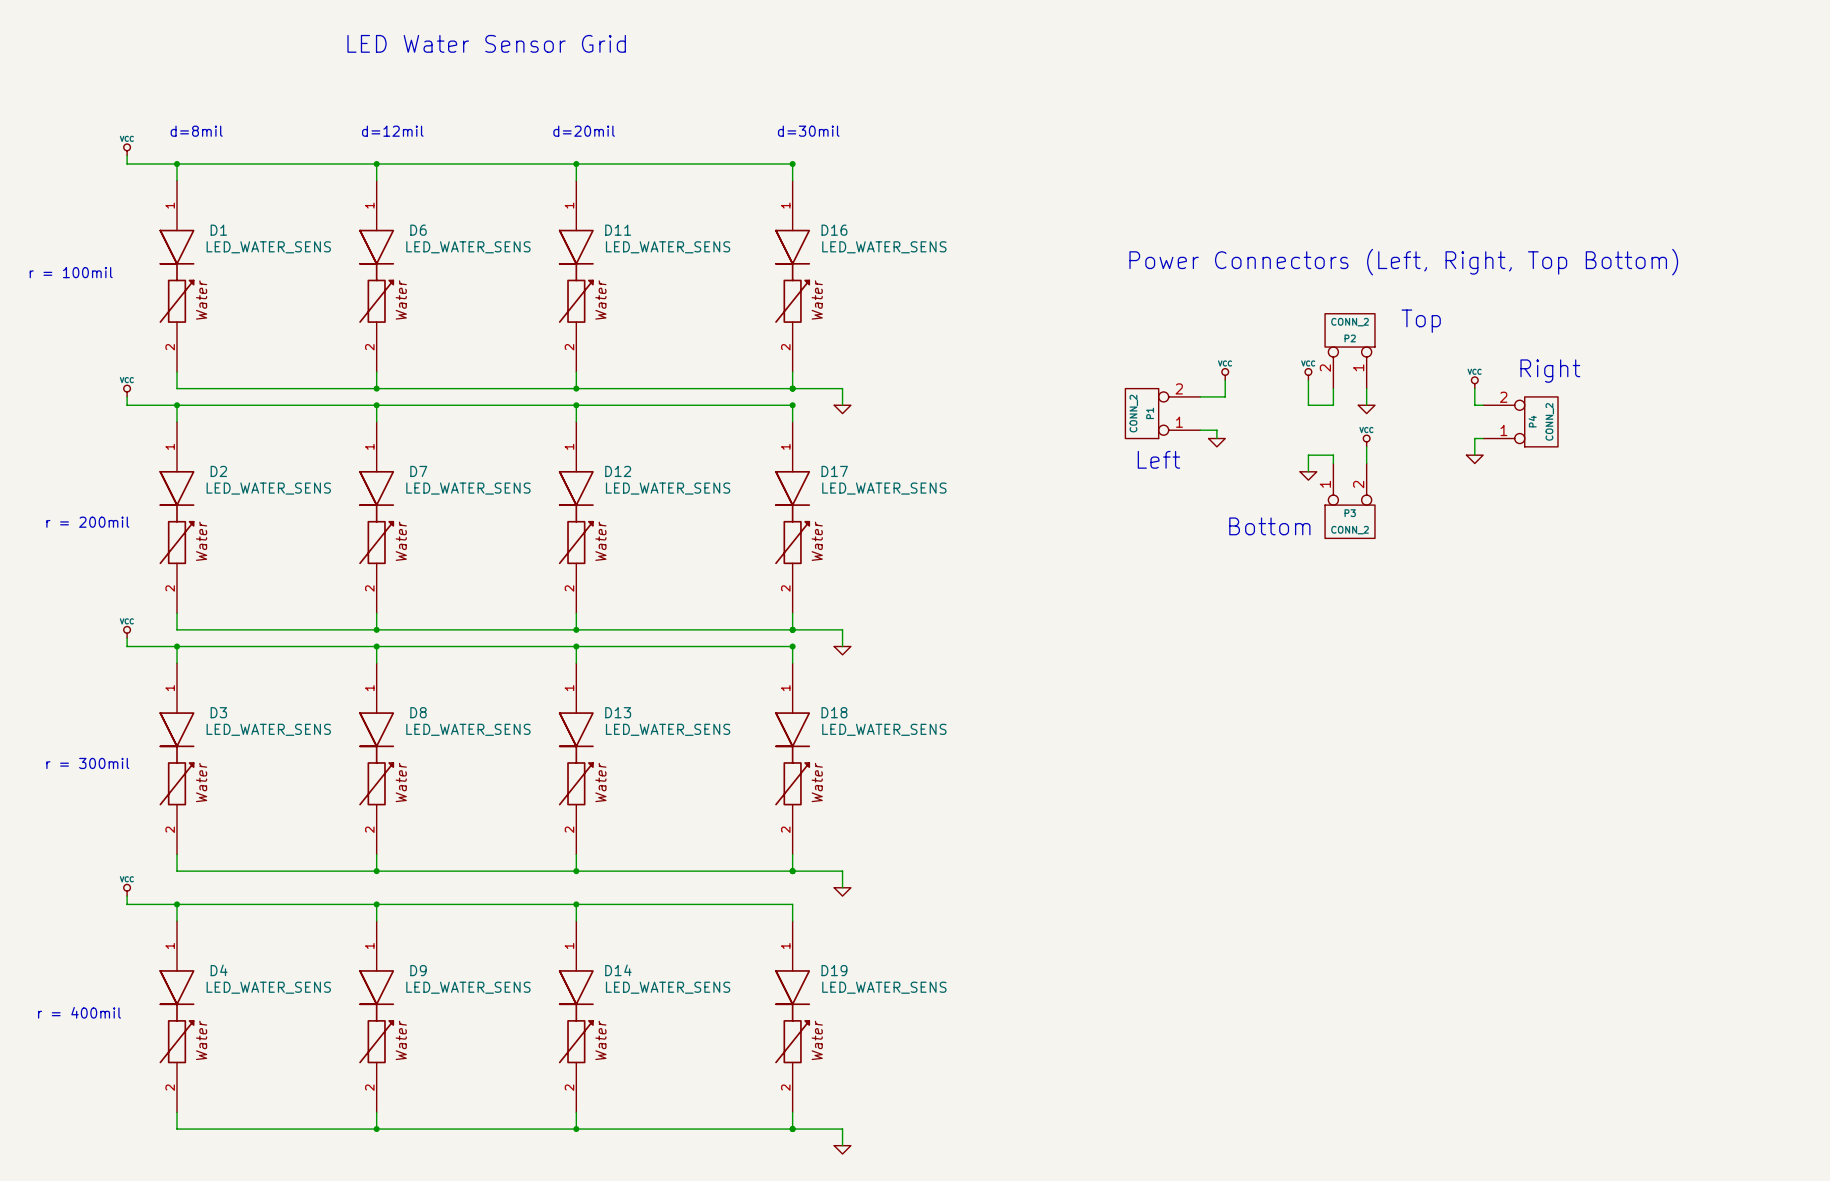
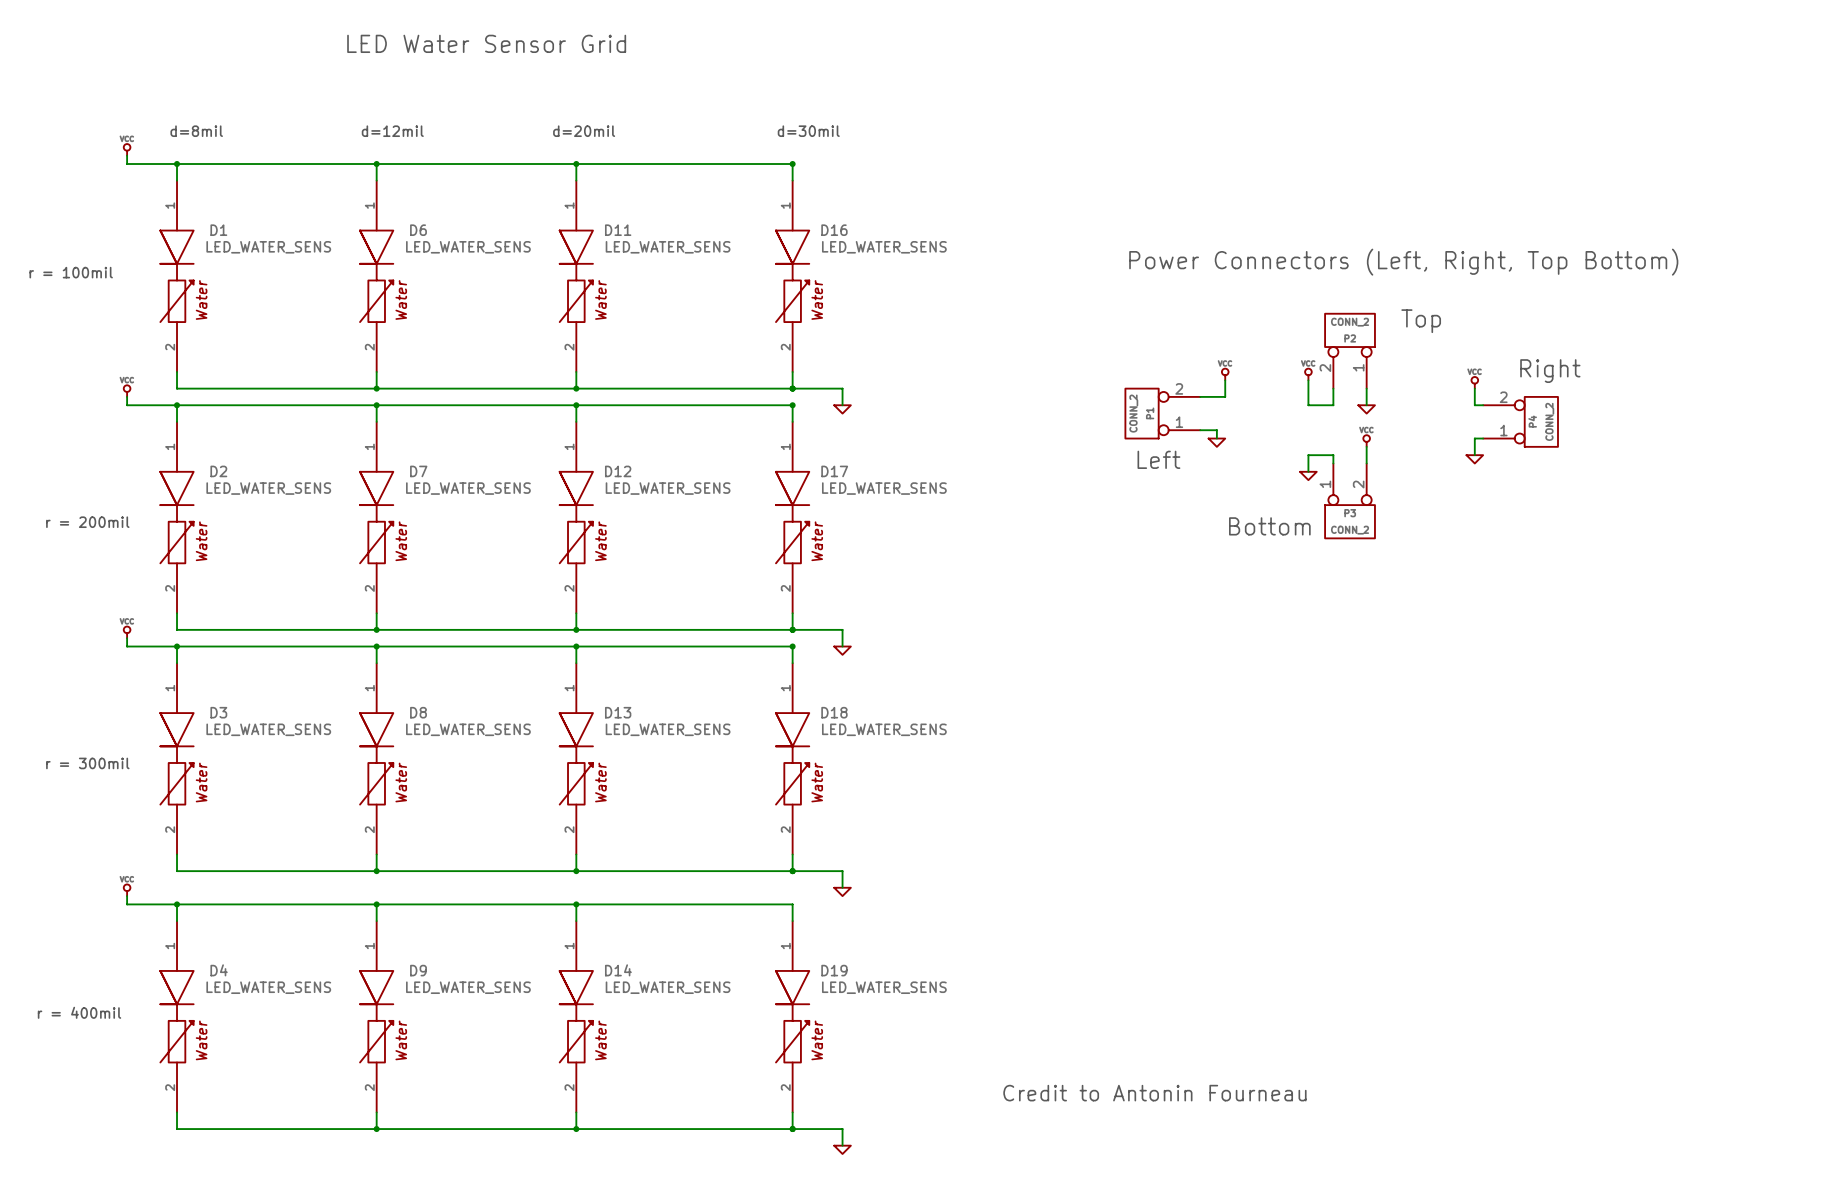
text: none -> Credit to Antonin Fourneau (1154, 1093)

